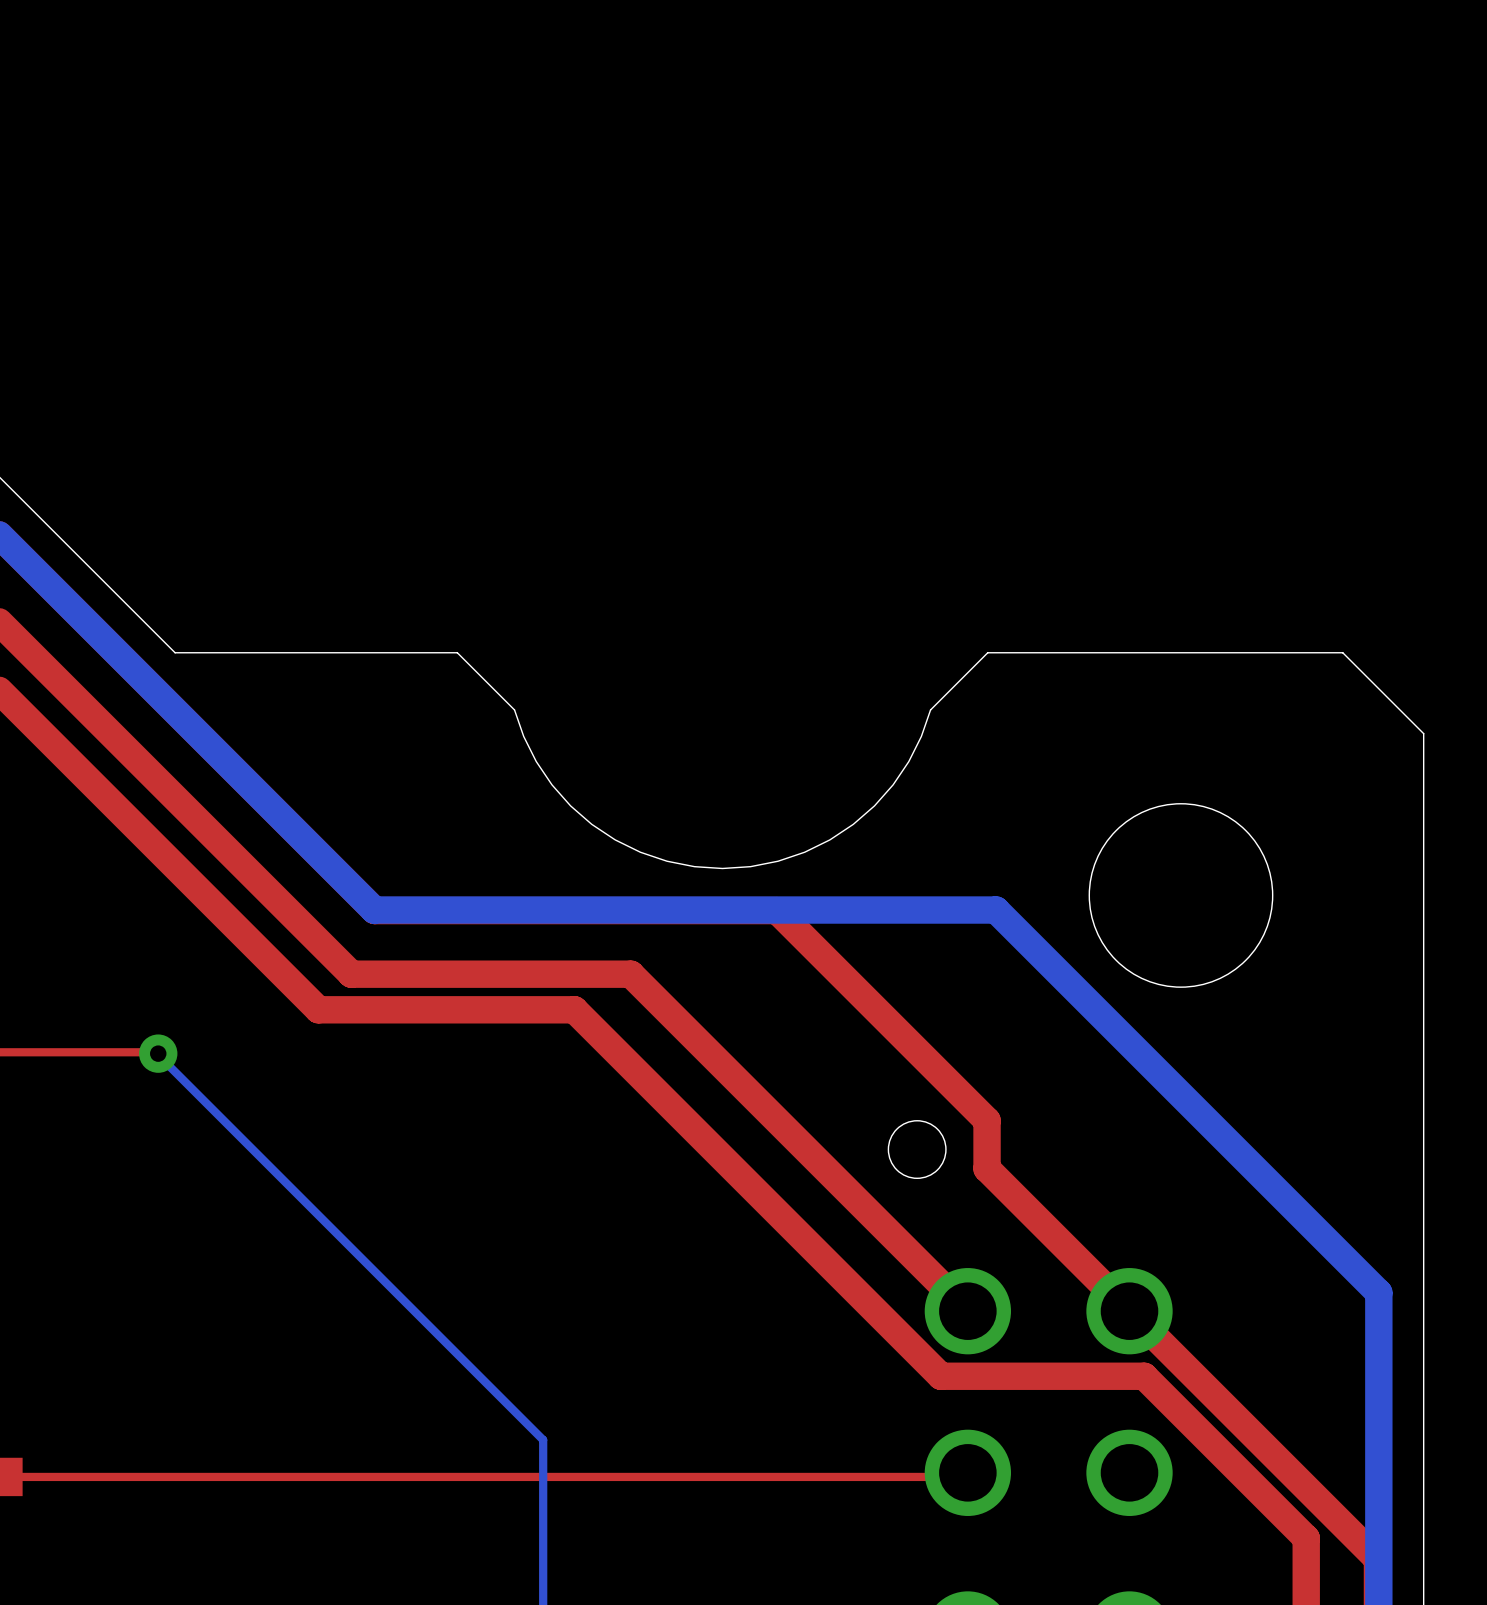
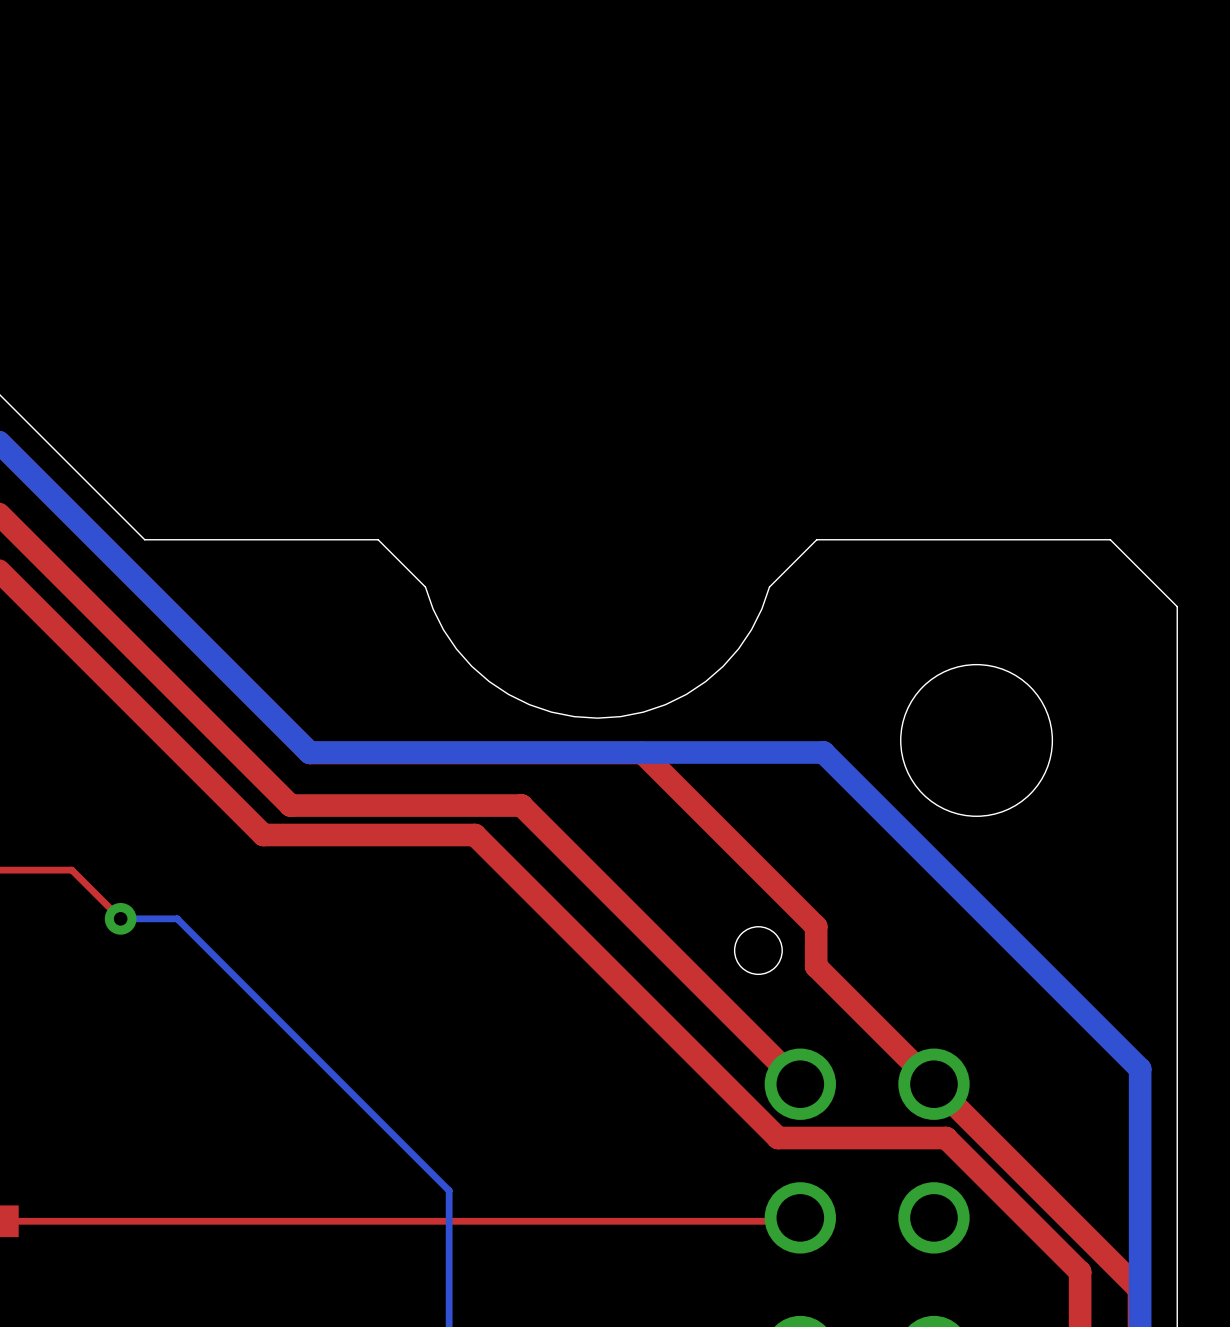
top track: (87, 1052) (158, 1053) -> (71, 870) (120, 918)
bottom track: (158, 1053) (214, 1111) -> (120, 918) (177, 918)
via position: (158, 1053) -> (120, 918)

